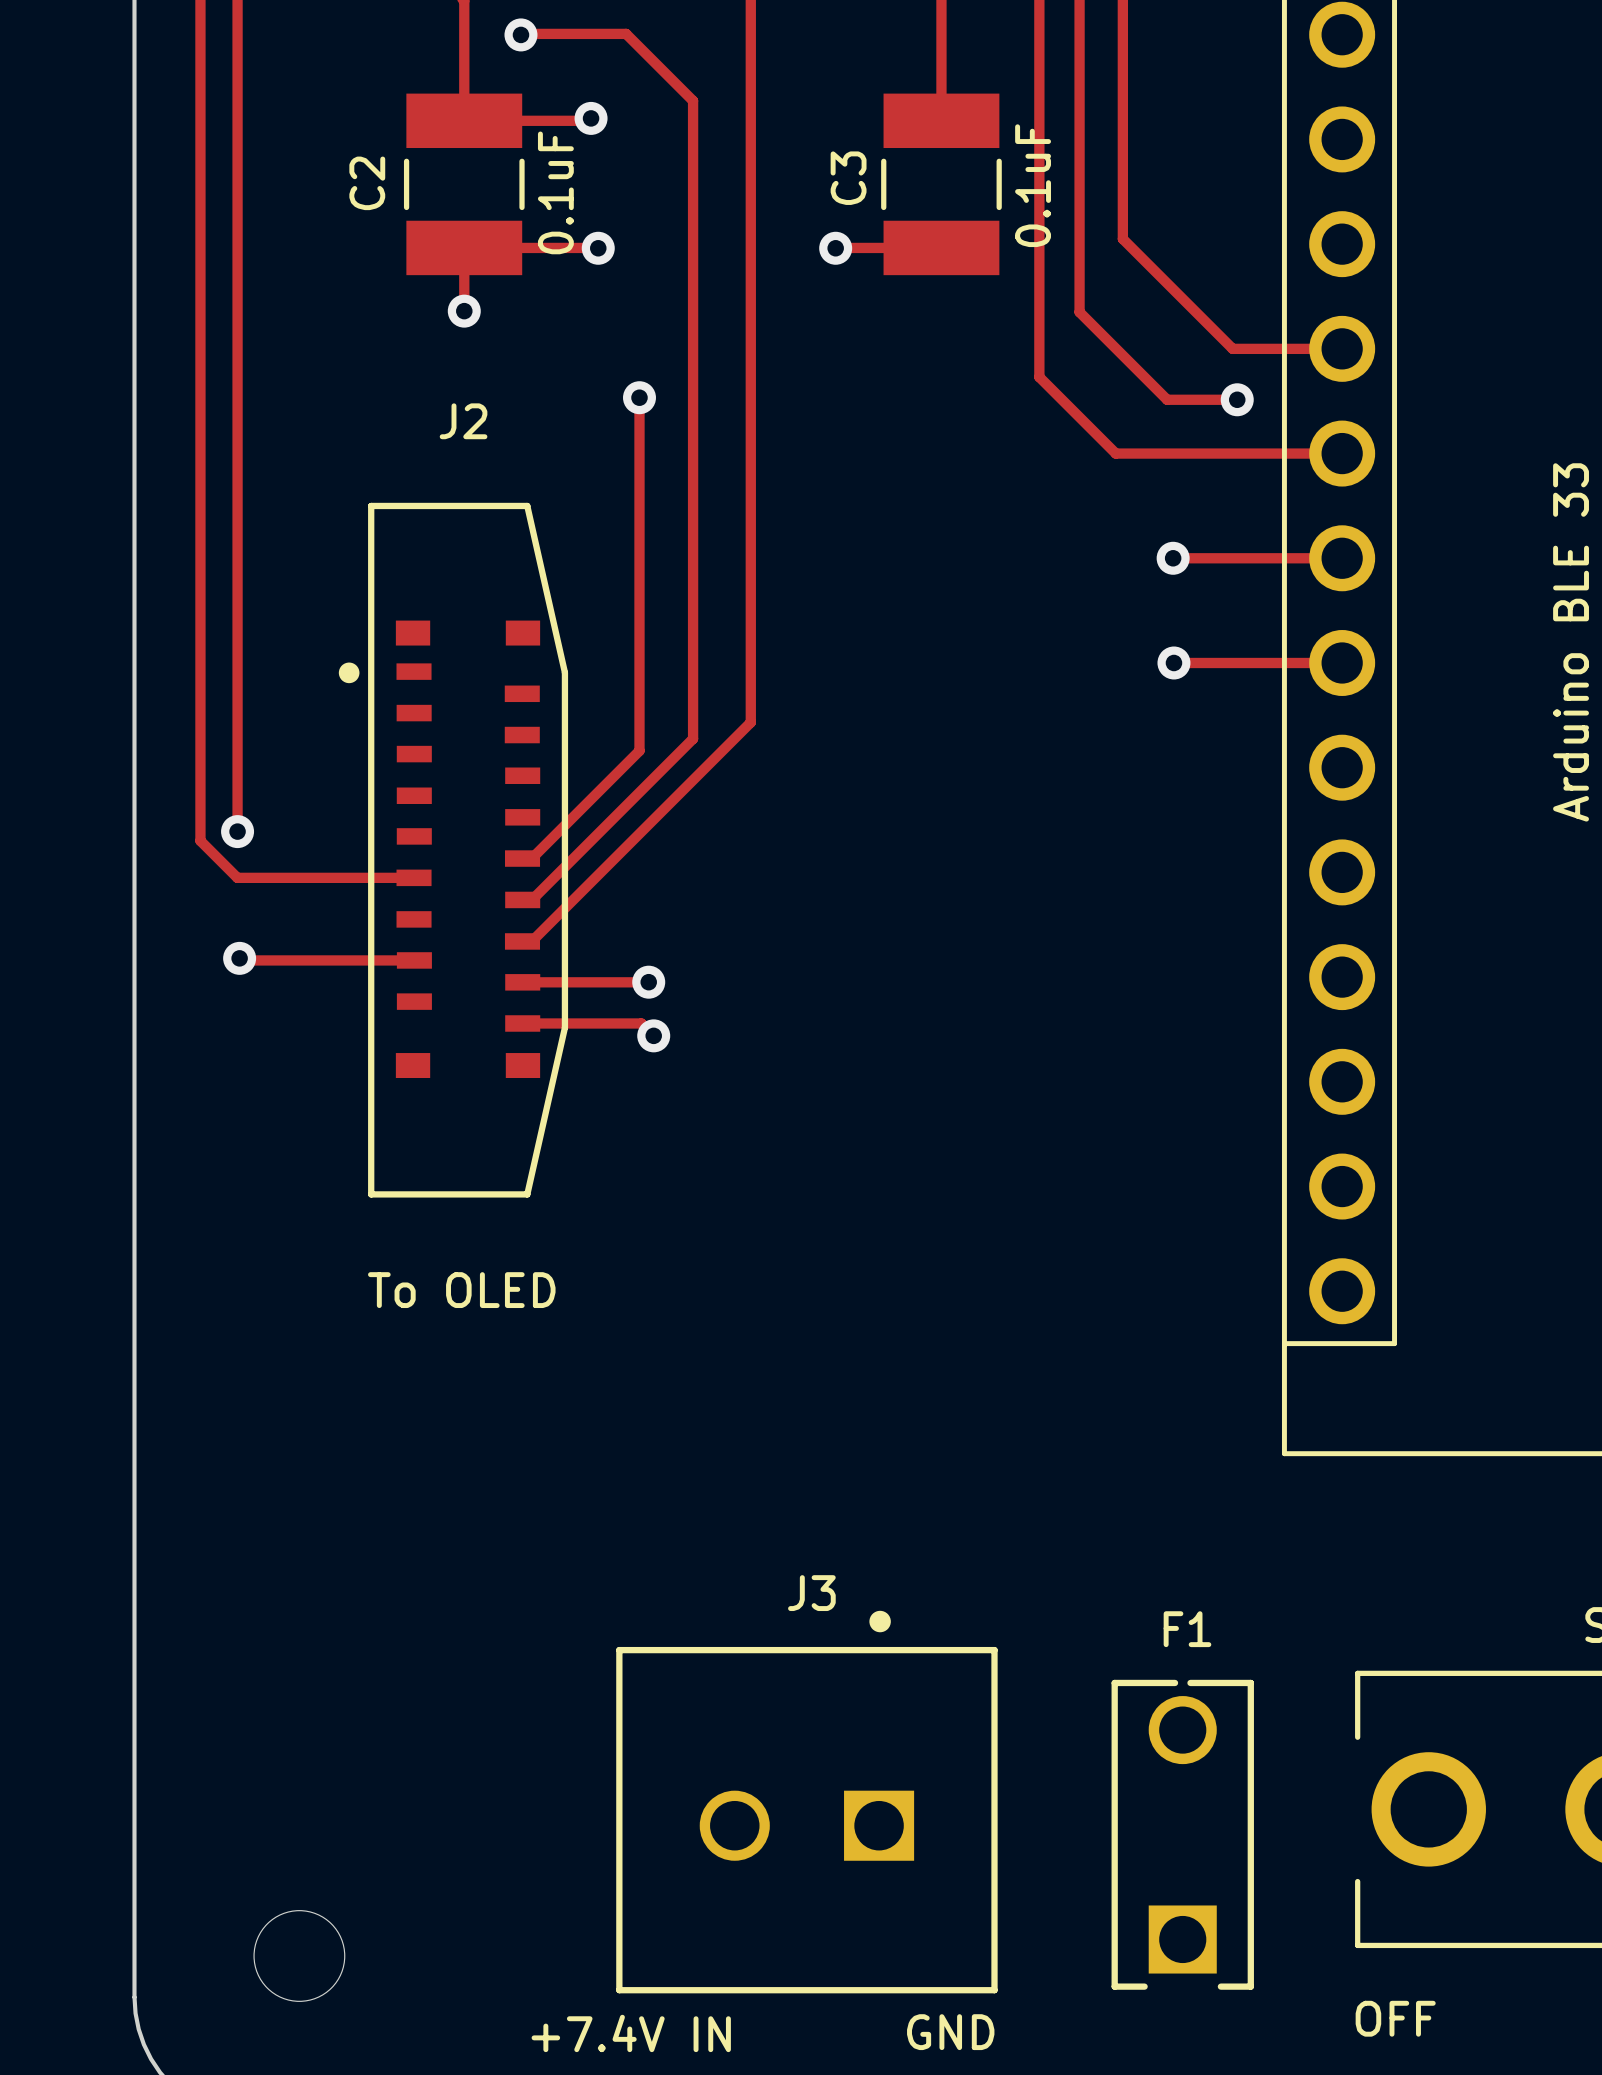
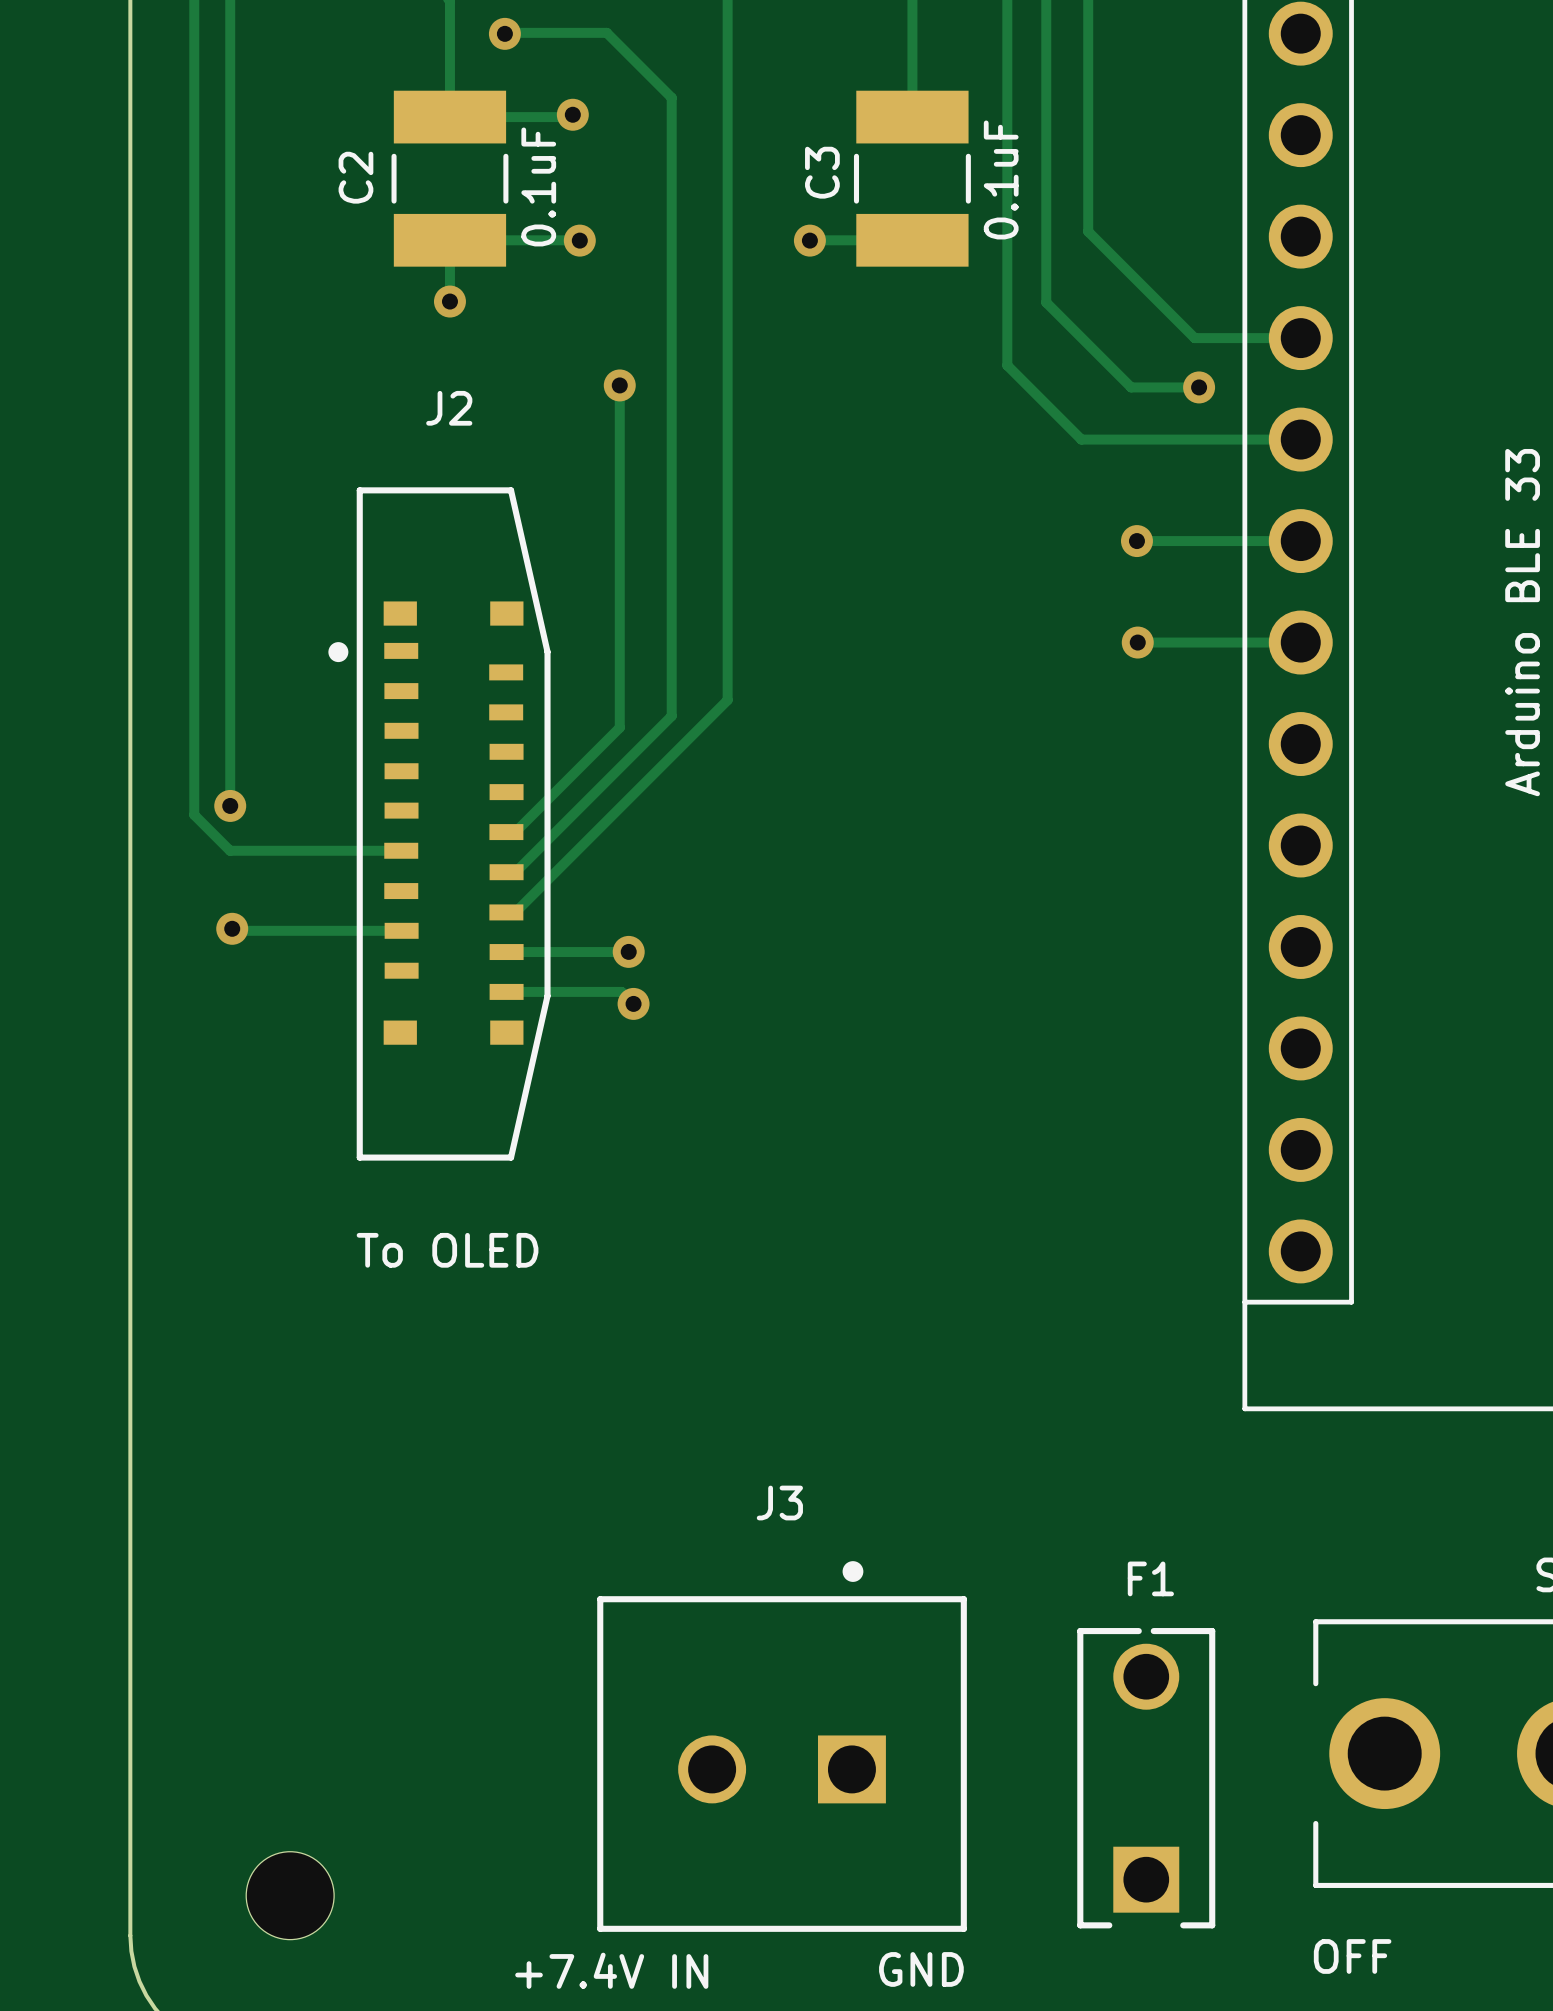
J3 name position: J3 (811, 1593) -> J3 (779, 1503)

